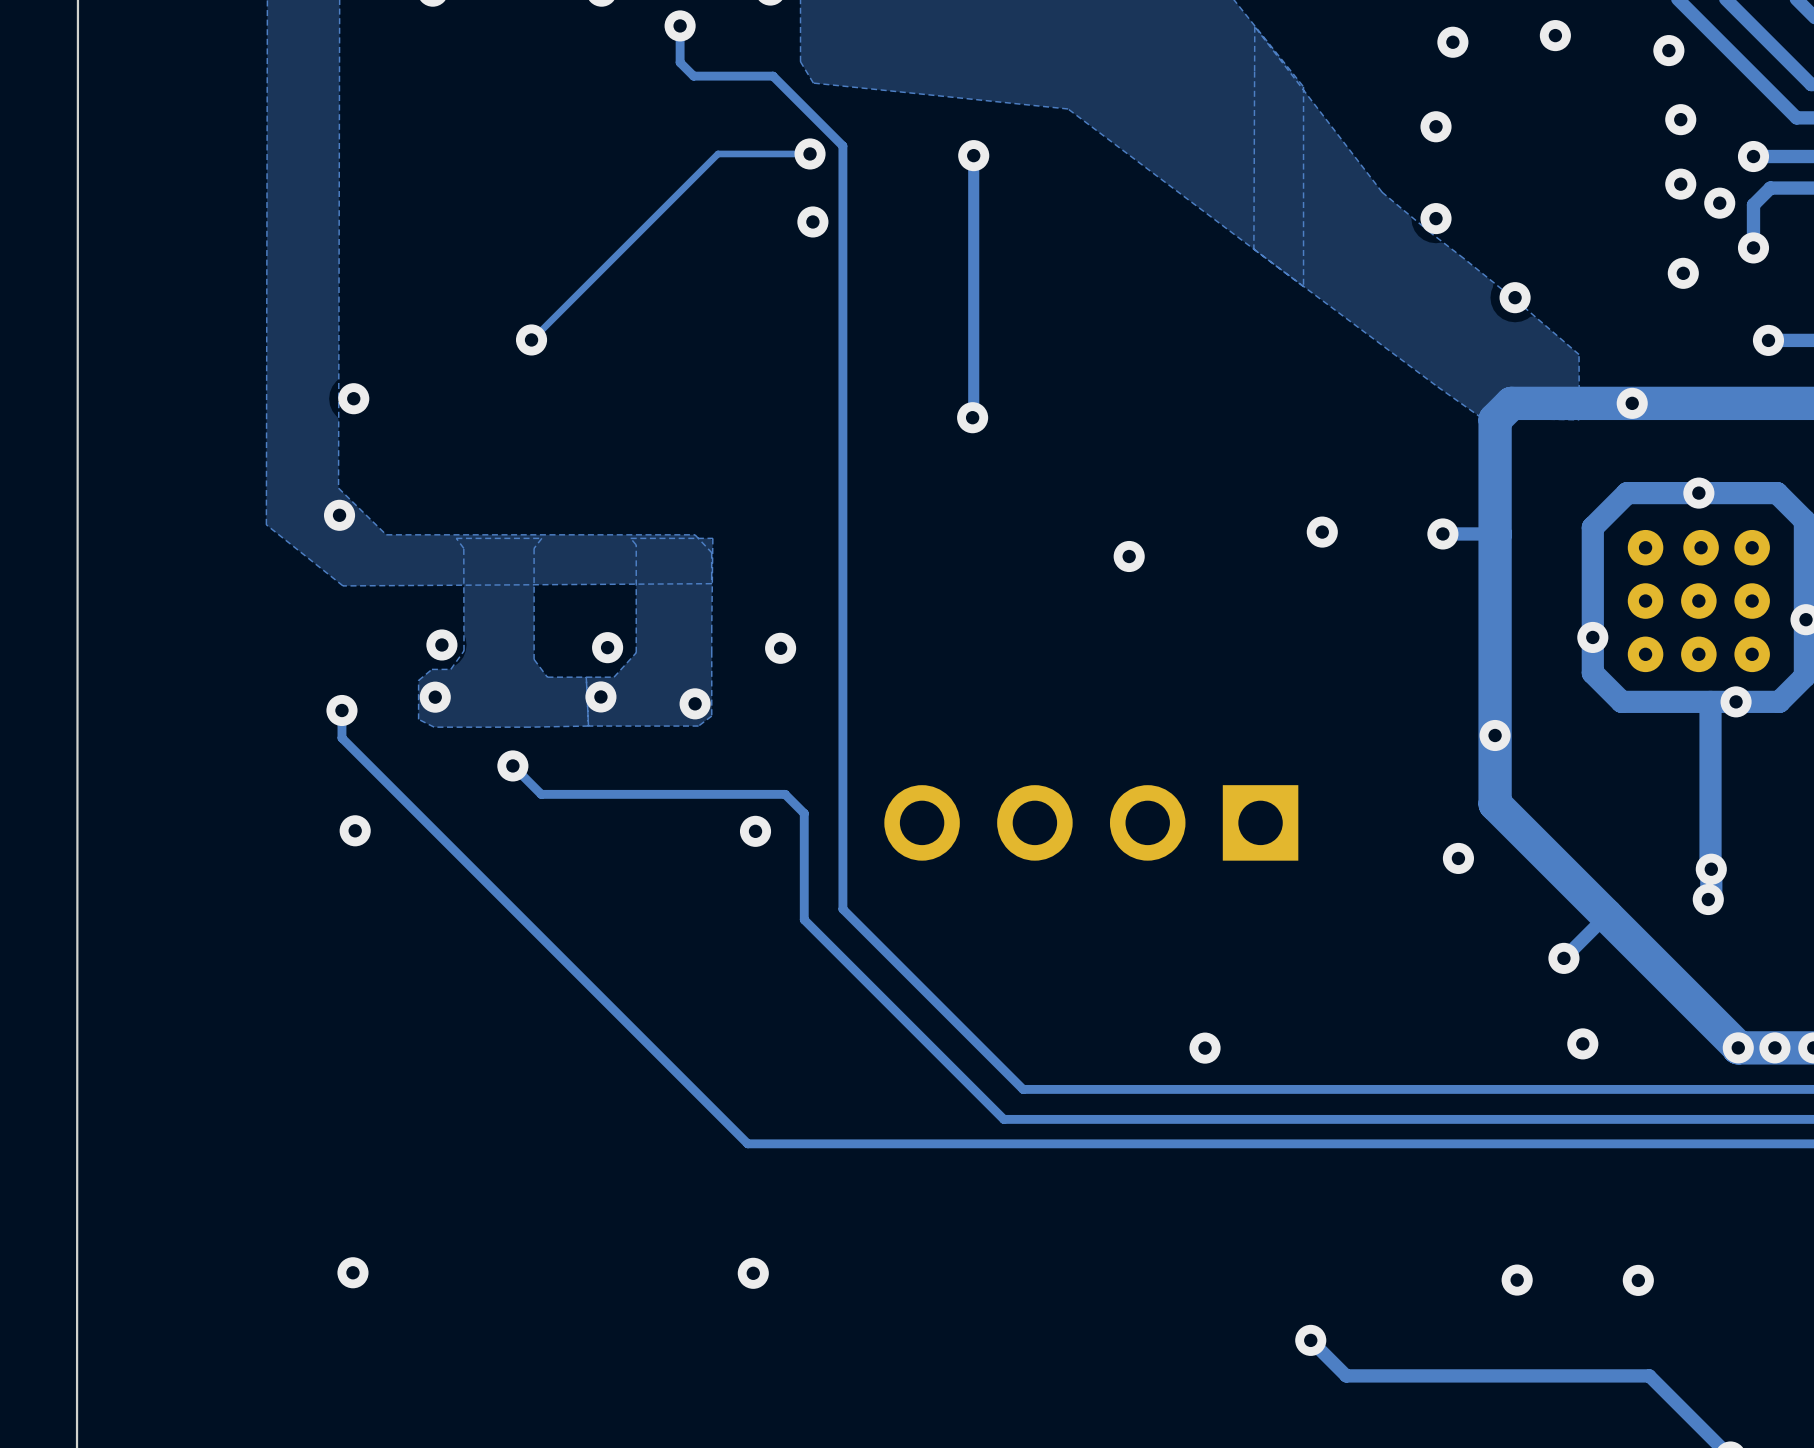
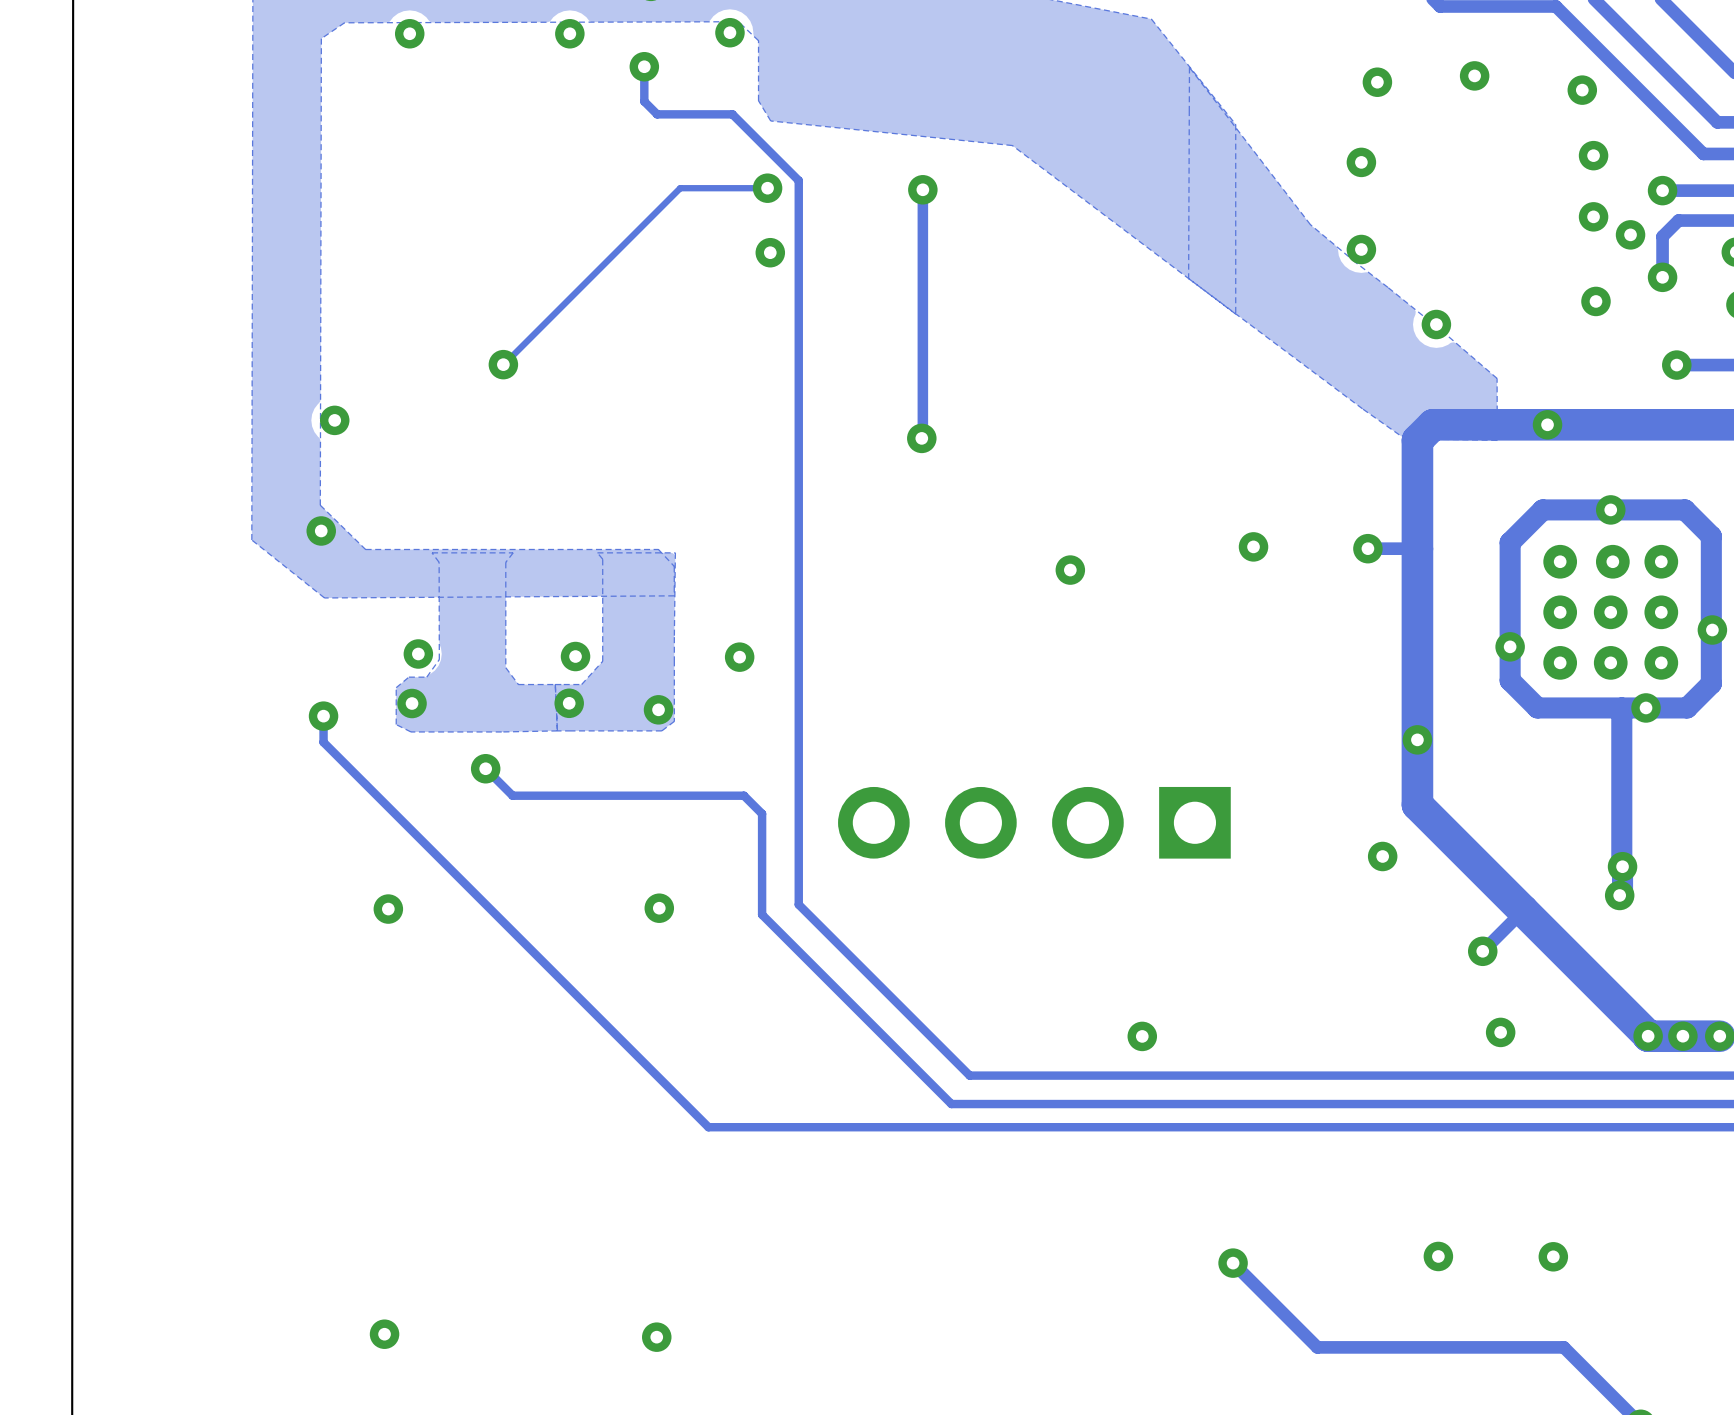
via position: (355, 830) -> (388, 909)
via position: (755, 831) -> (659, 908)
via position: (352, 1272) -> (384, 1334)
via position: (753, 1273) -> (656, 1337)
track: (1310, 1340) (1346, 1375) (1389, 1375) -> (1233, 1263) (1317, 1347)
via position: (1310, 1340) -> (1233, 1263)

